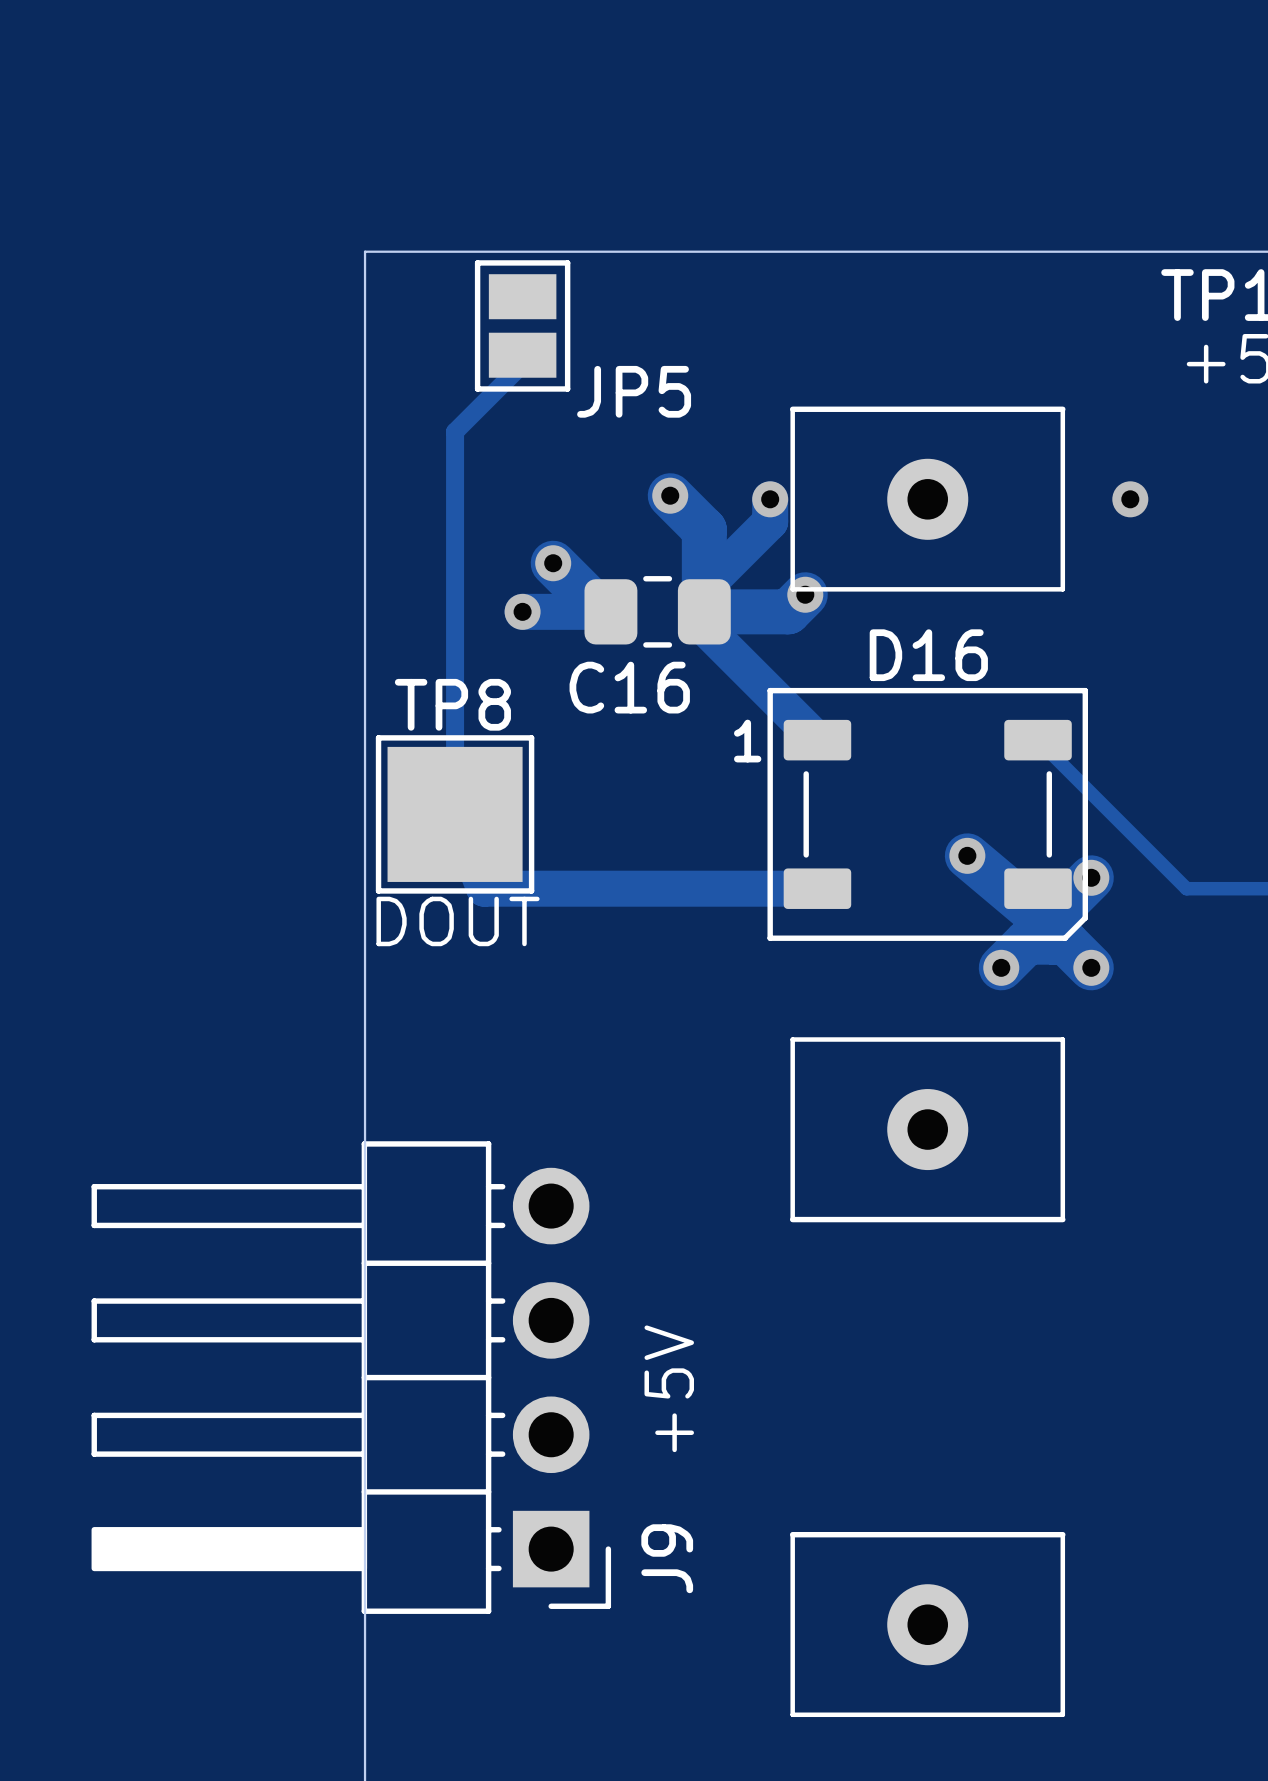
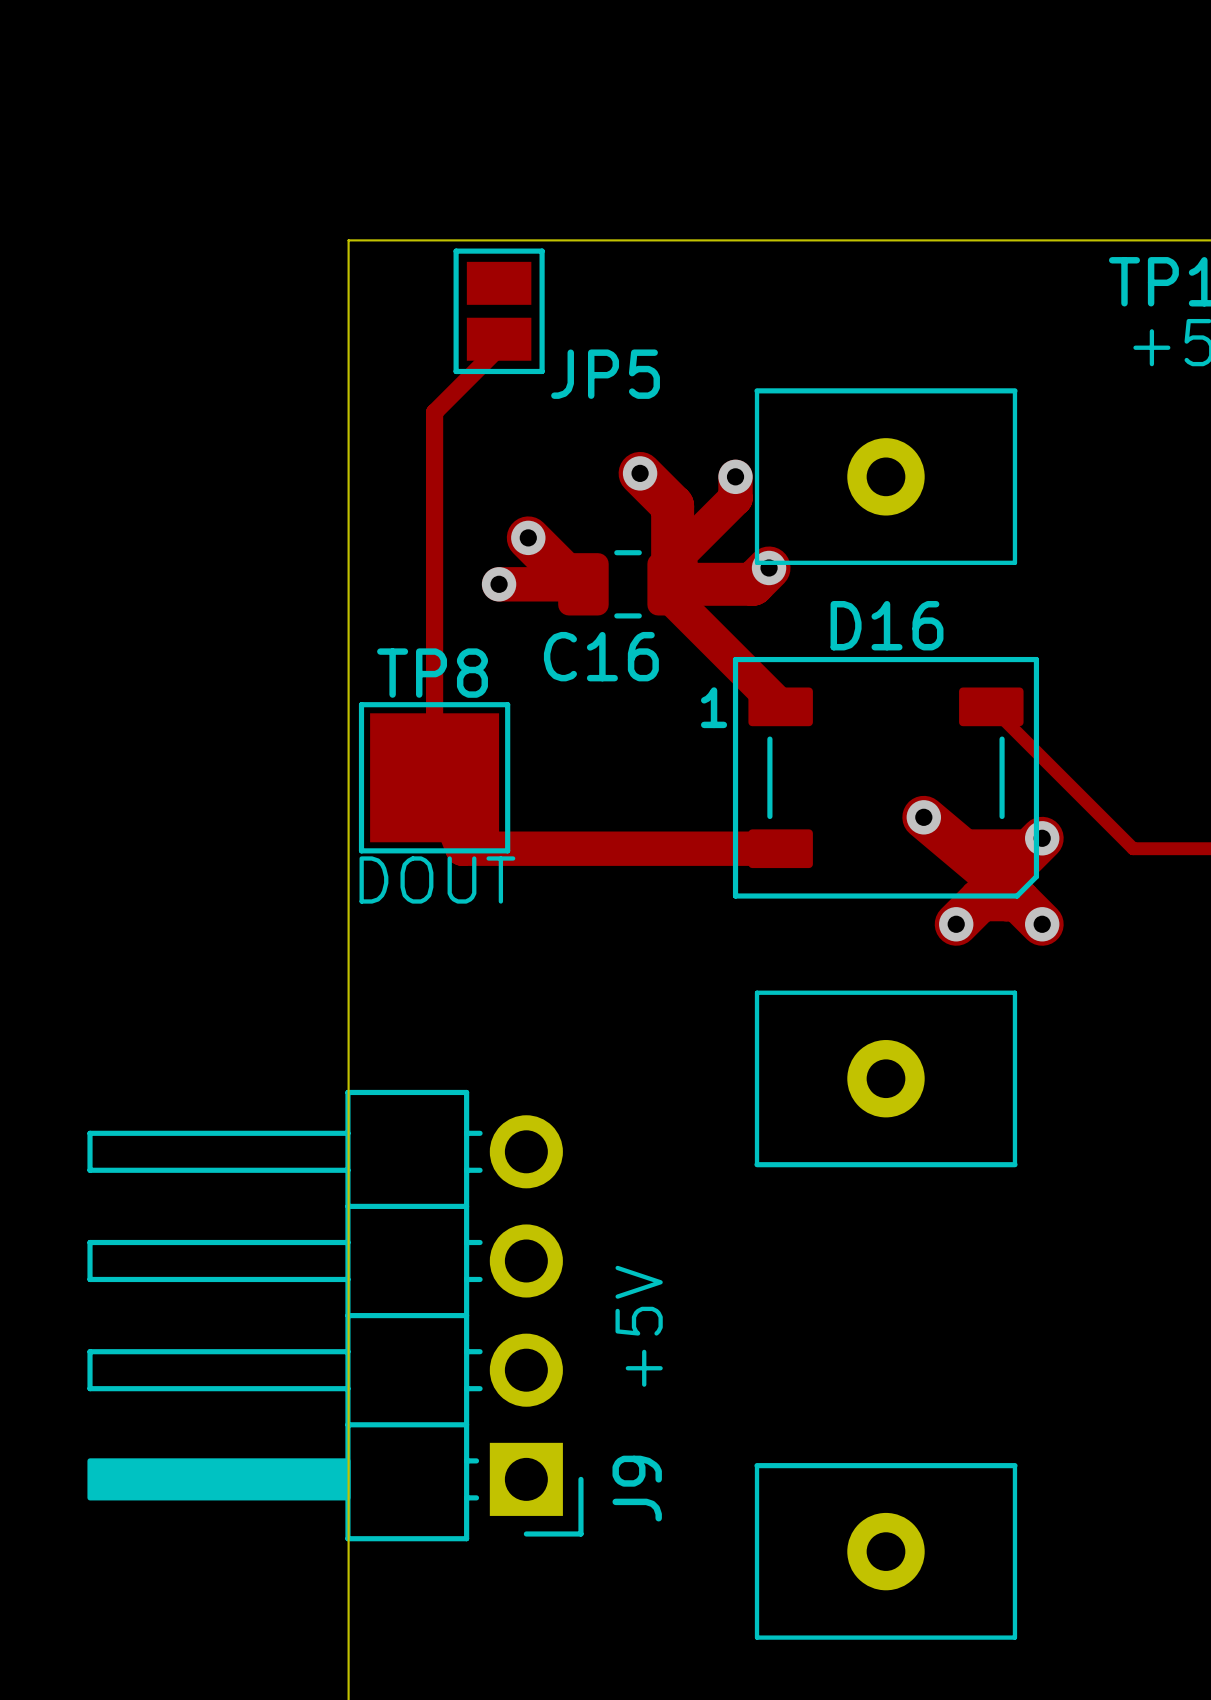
via: (1130, 499) -> none

